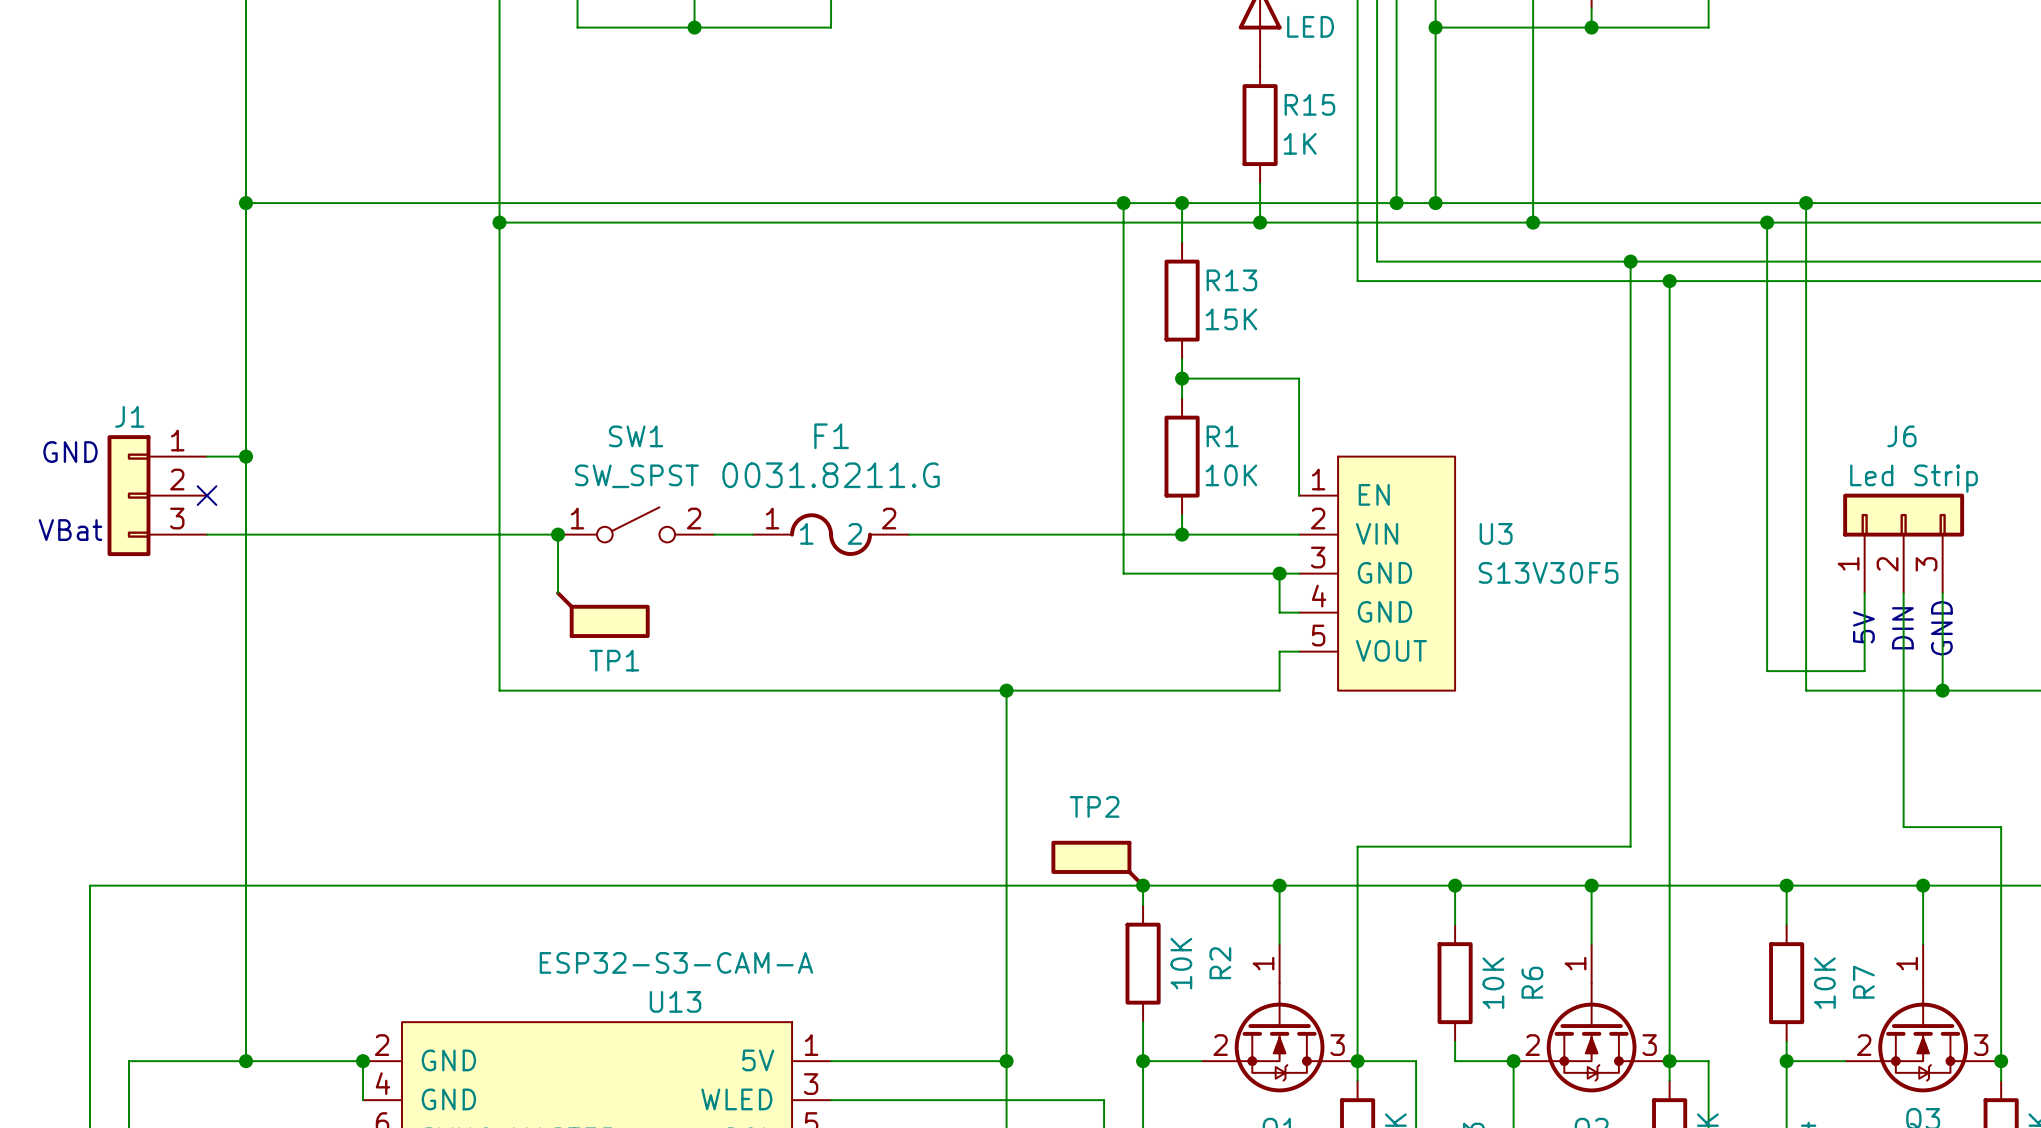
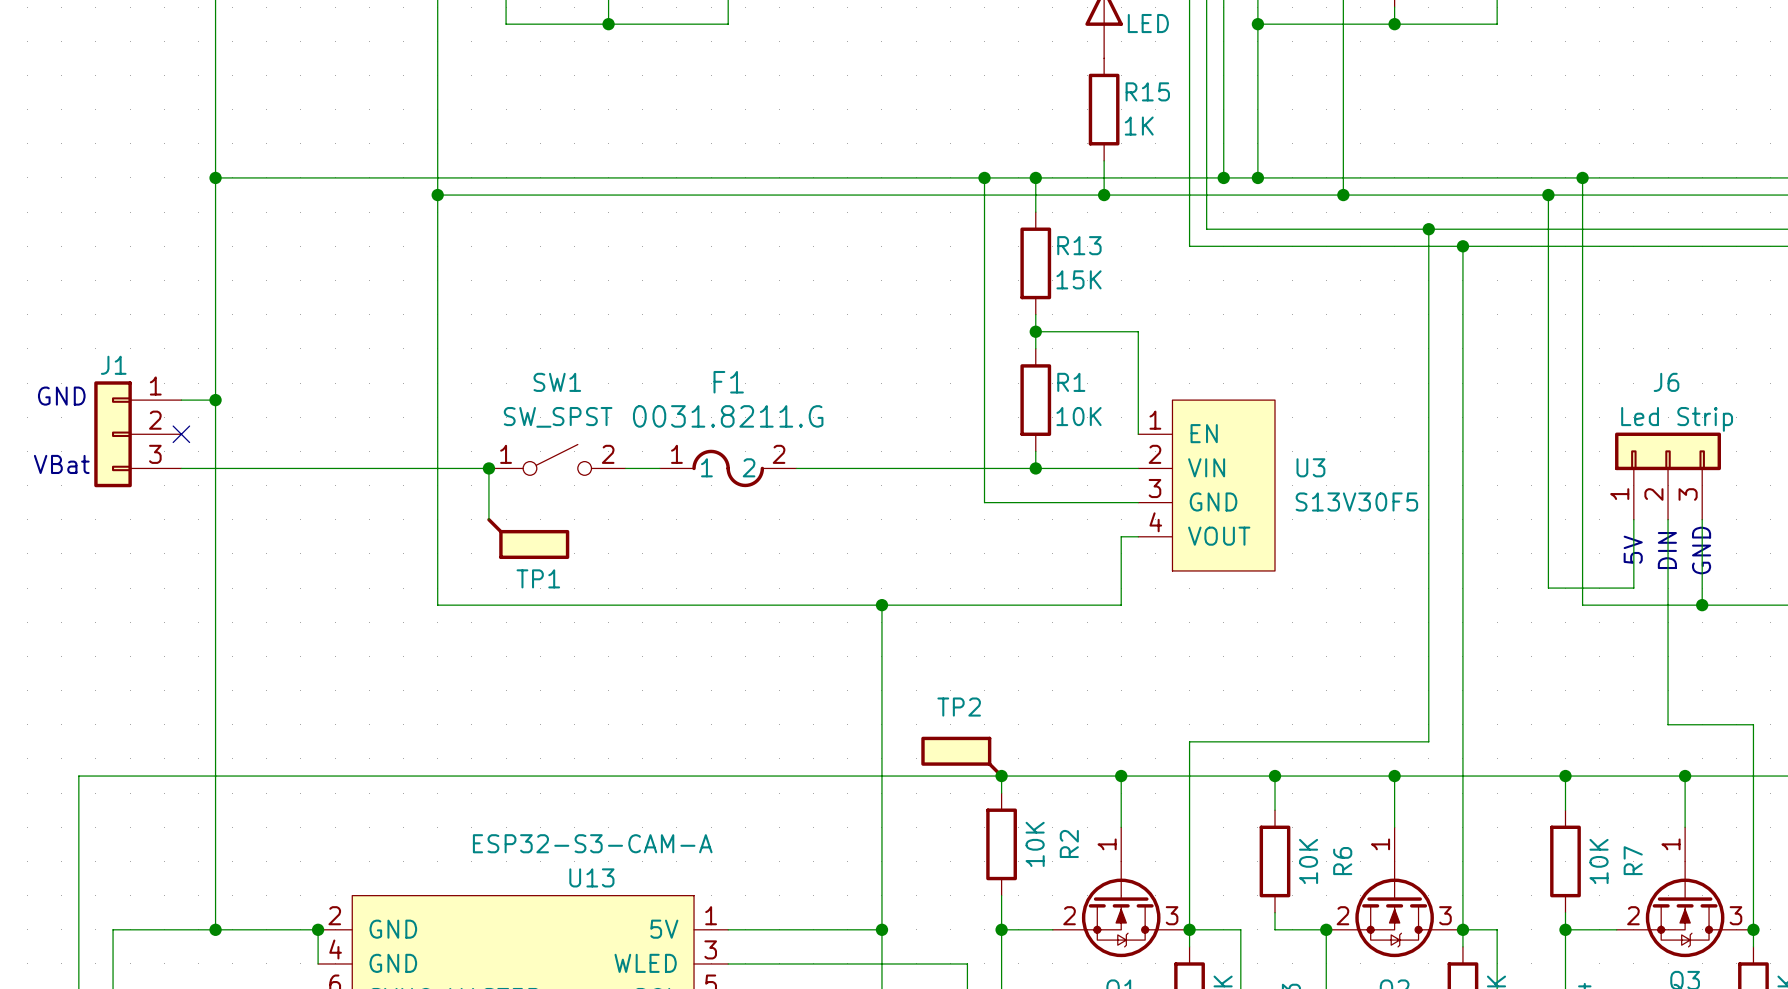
U3 symbol: [1299, 456, 1456, 691] -> [1138, 400, 1276, 571]
wire: (1279, 573) (1279, 612) -> none
junction: (1279, 573) -> none
wire: (1279, 651) (1299, 651) -> (1121, 570) (1121, 536)

